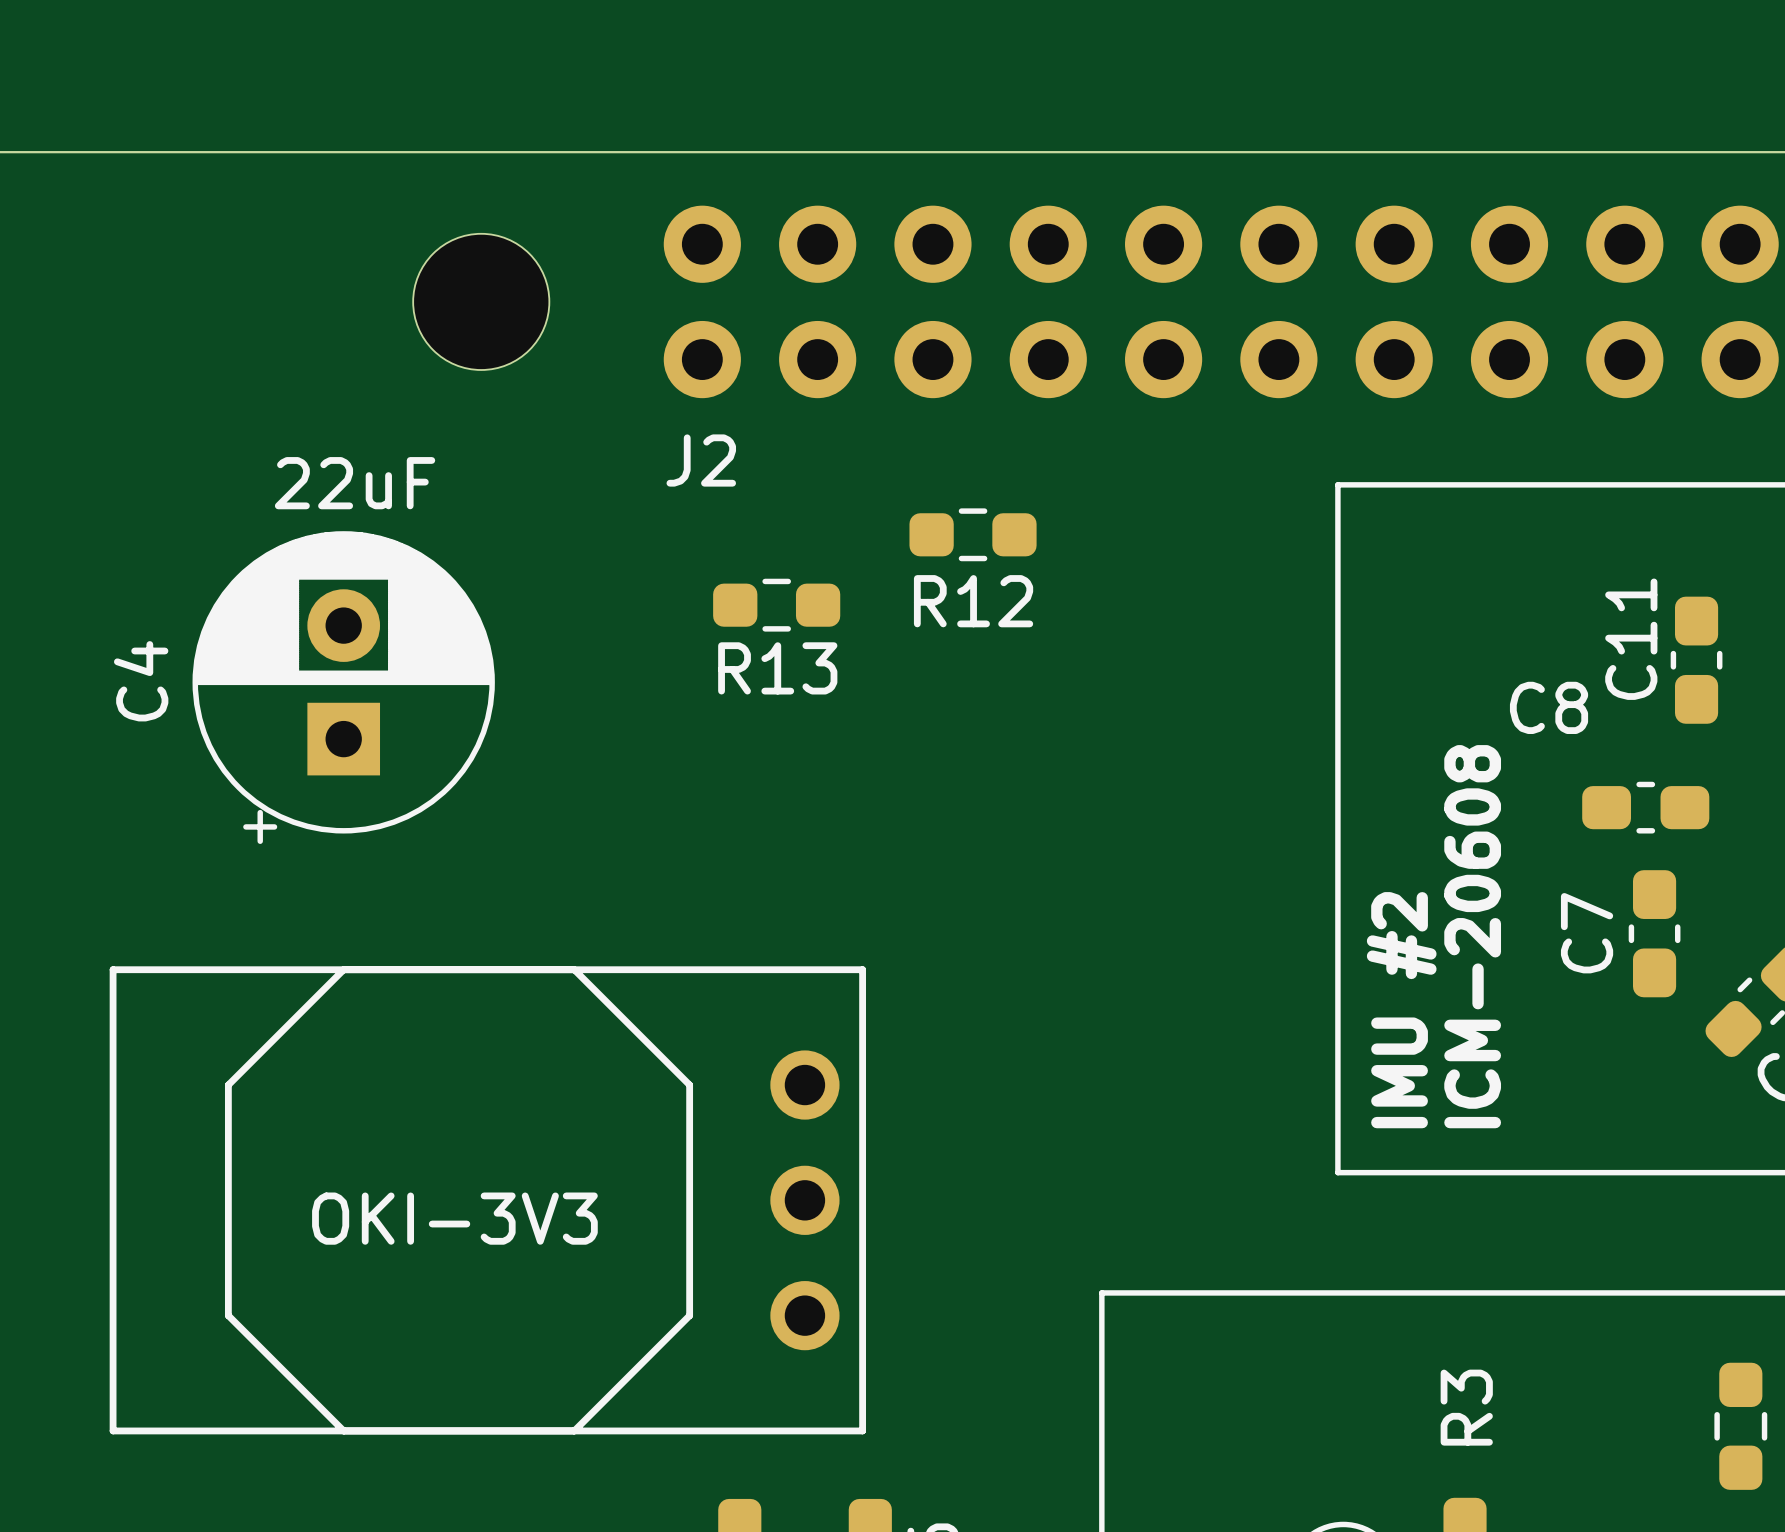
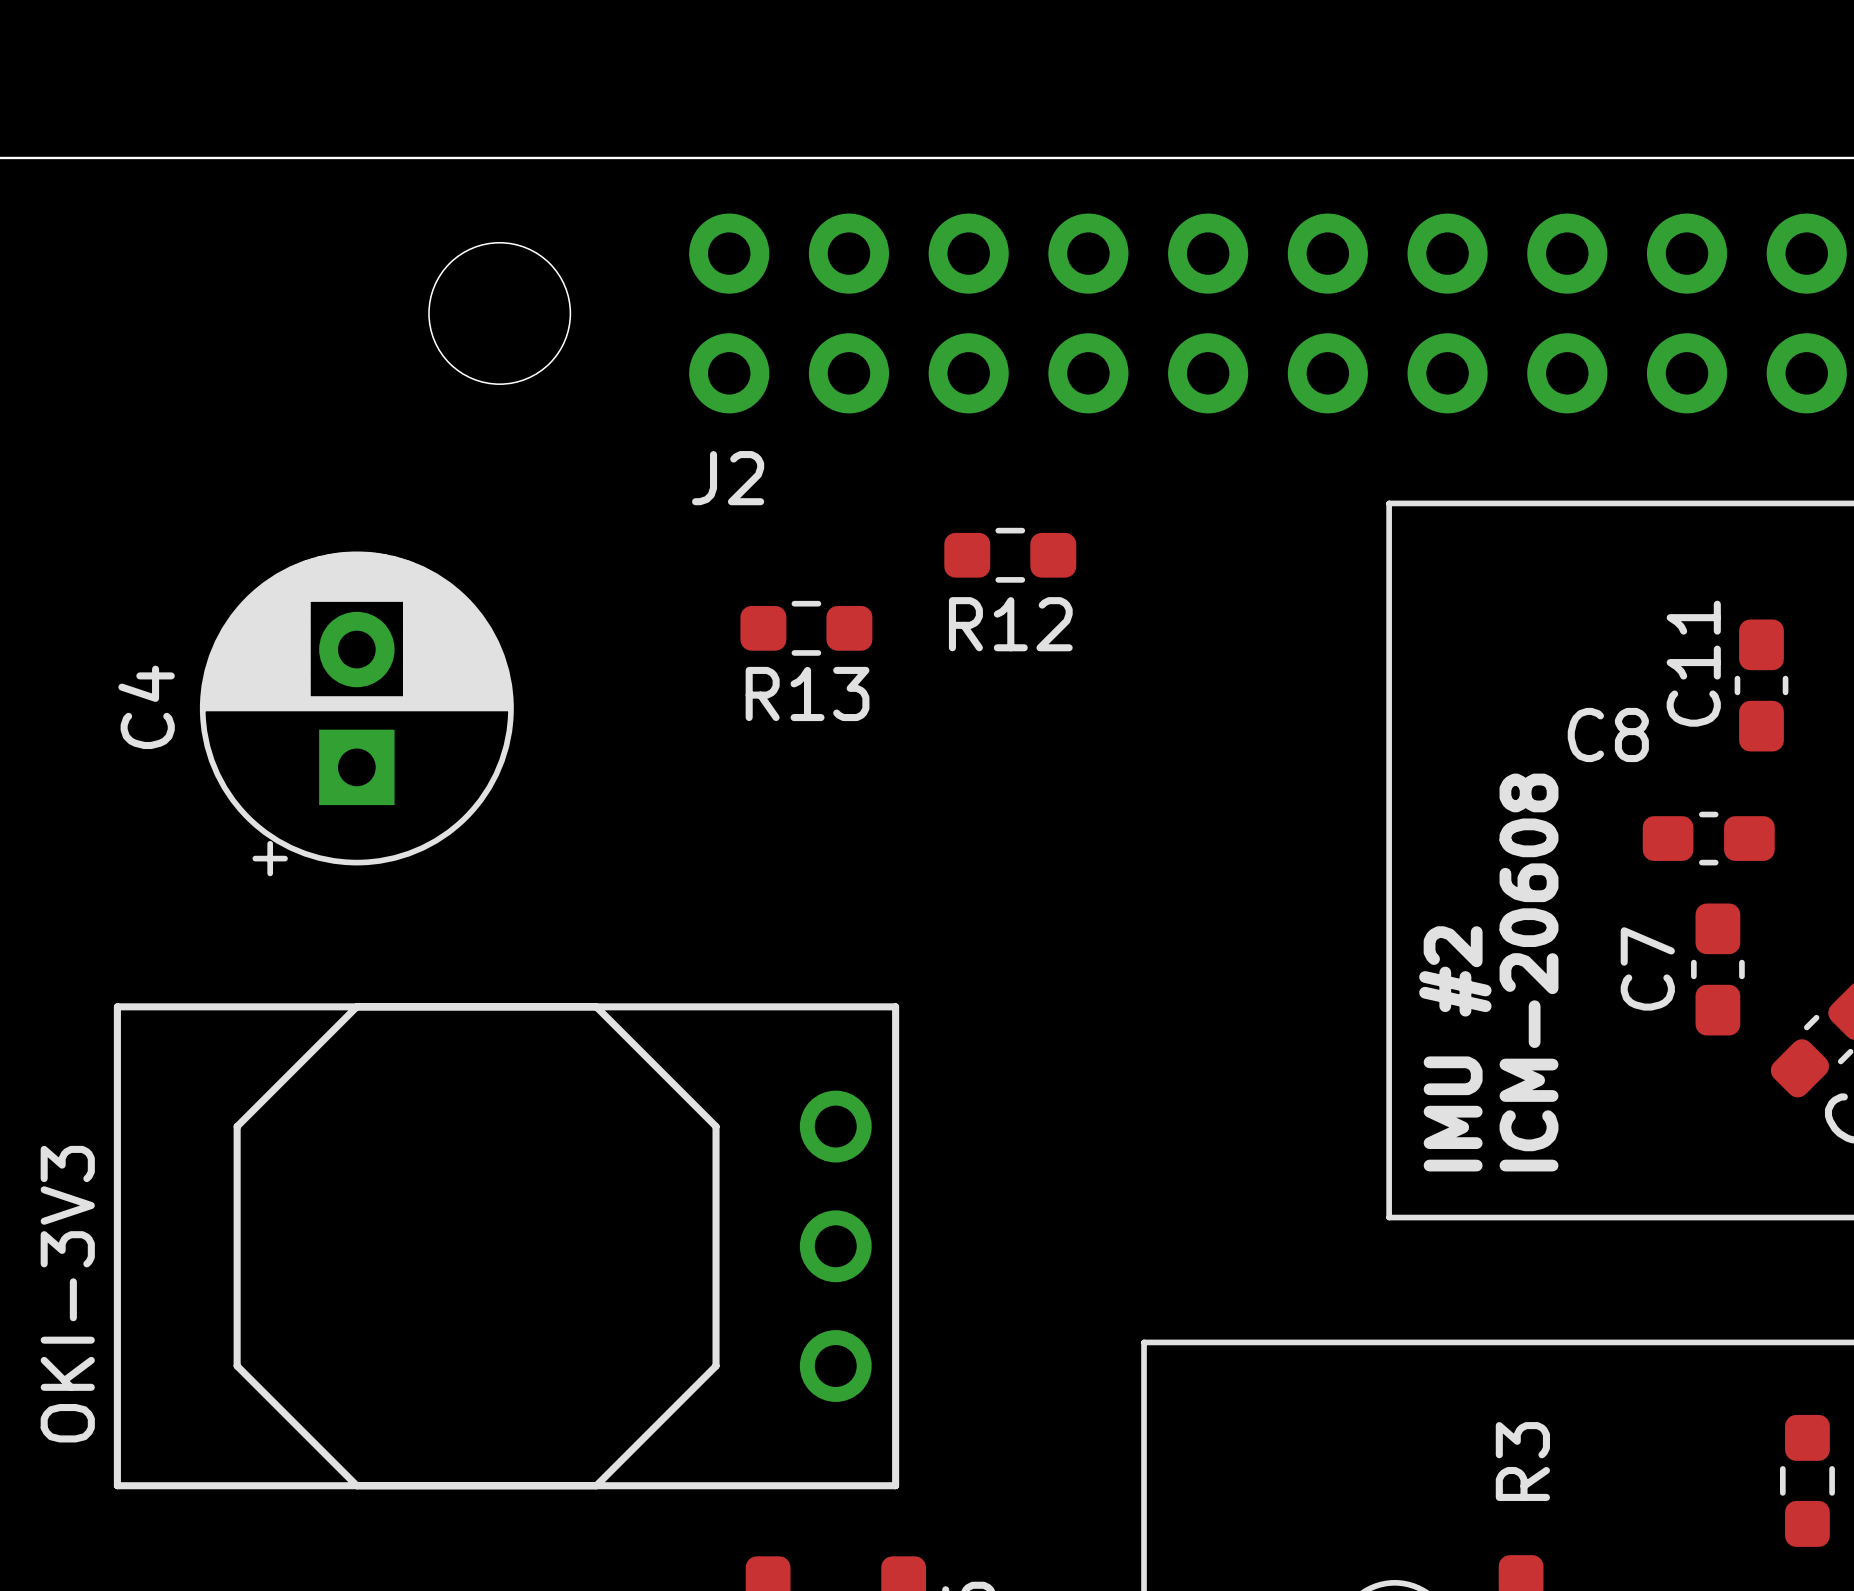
text: 22uF (355, 483) -> none
part value rotation: 0° (454, 1218) -> 90° counterclockwise (67, 1294)
part value position: OKI-3V3 (454, 1218) -> OKI-3V3 (67, 1294)

